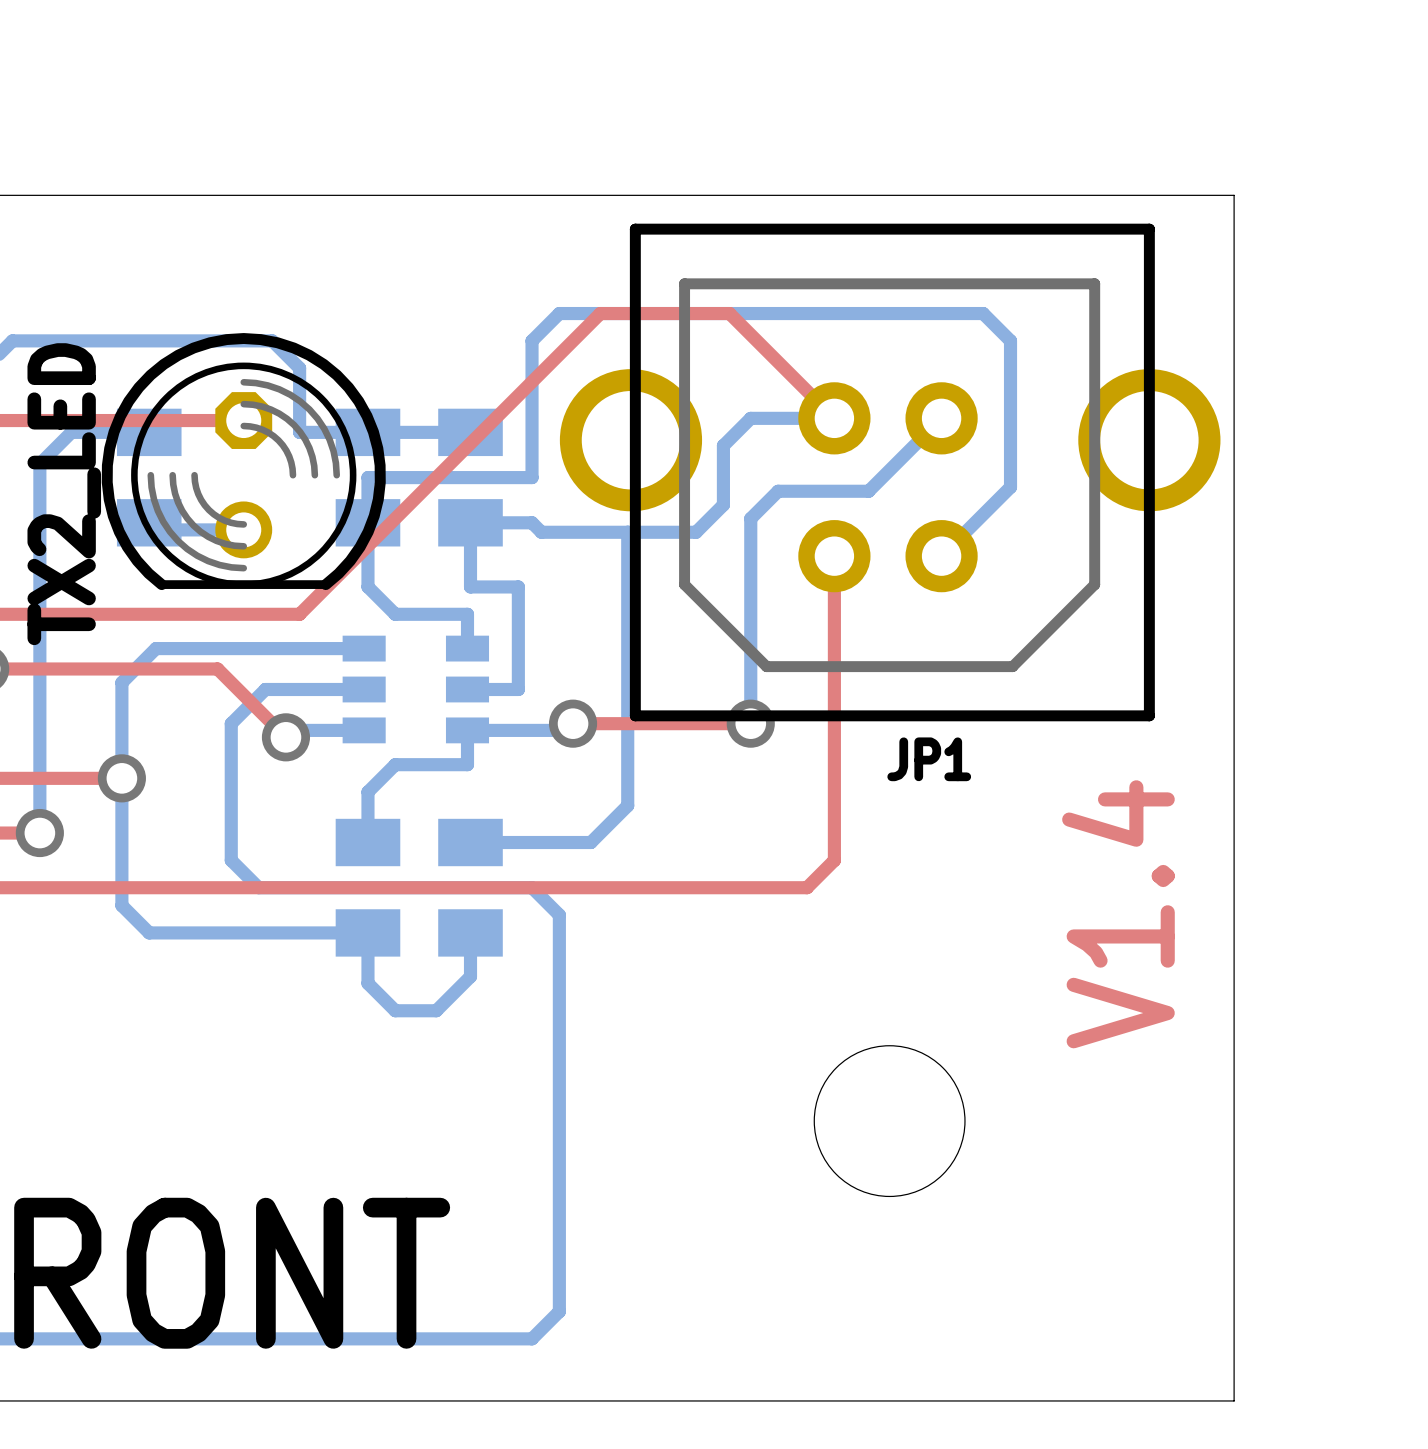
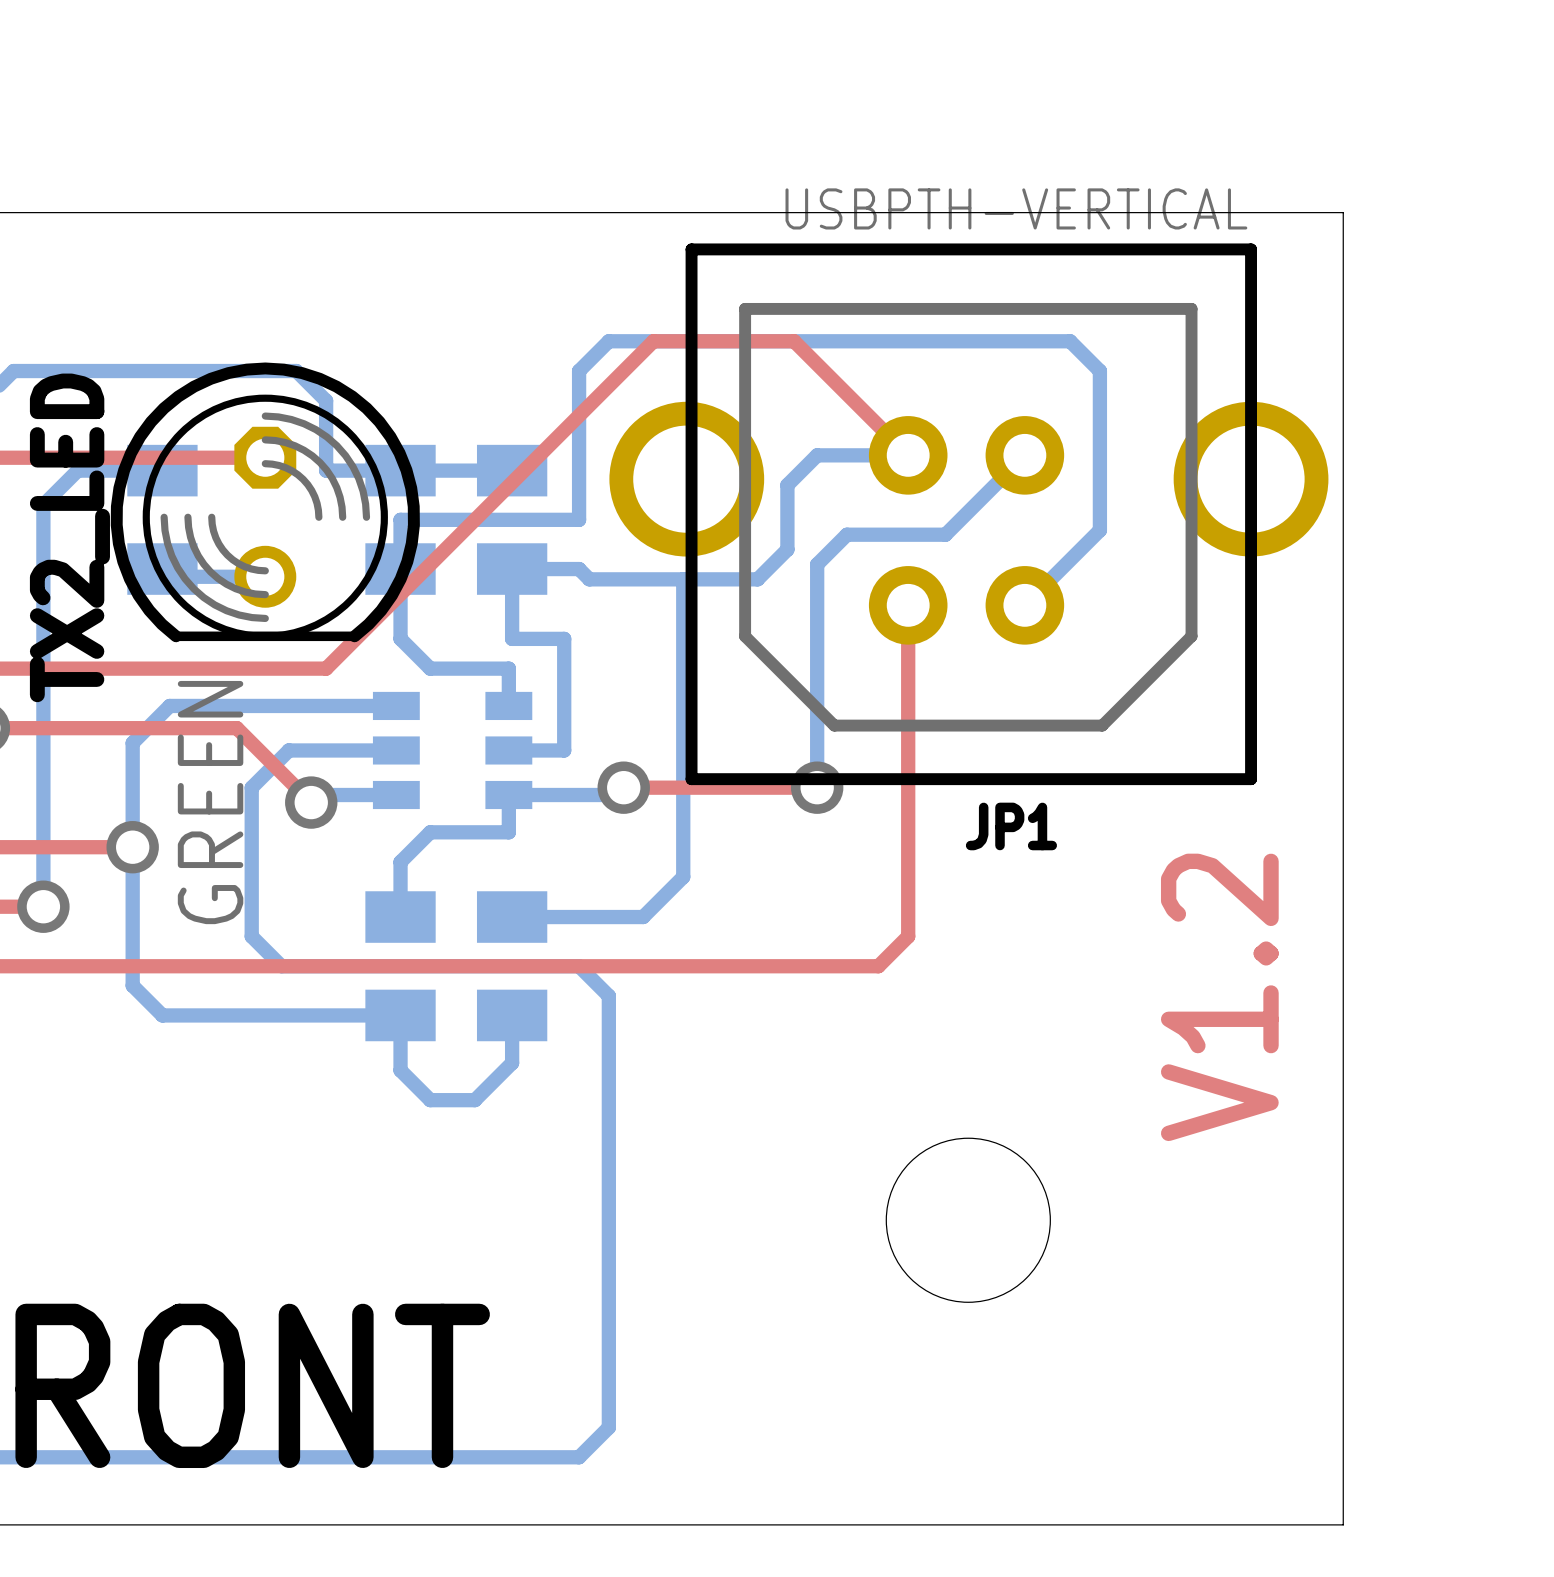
JP1 value: none -> USBPTH-VERTICAL (1016, 208)
TX2_LED value: none -> GREEN (210, 802)
text: V1.4 (1118, 914) -> V1.2 (1219, 997)

